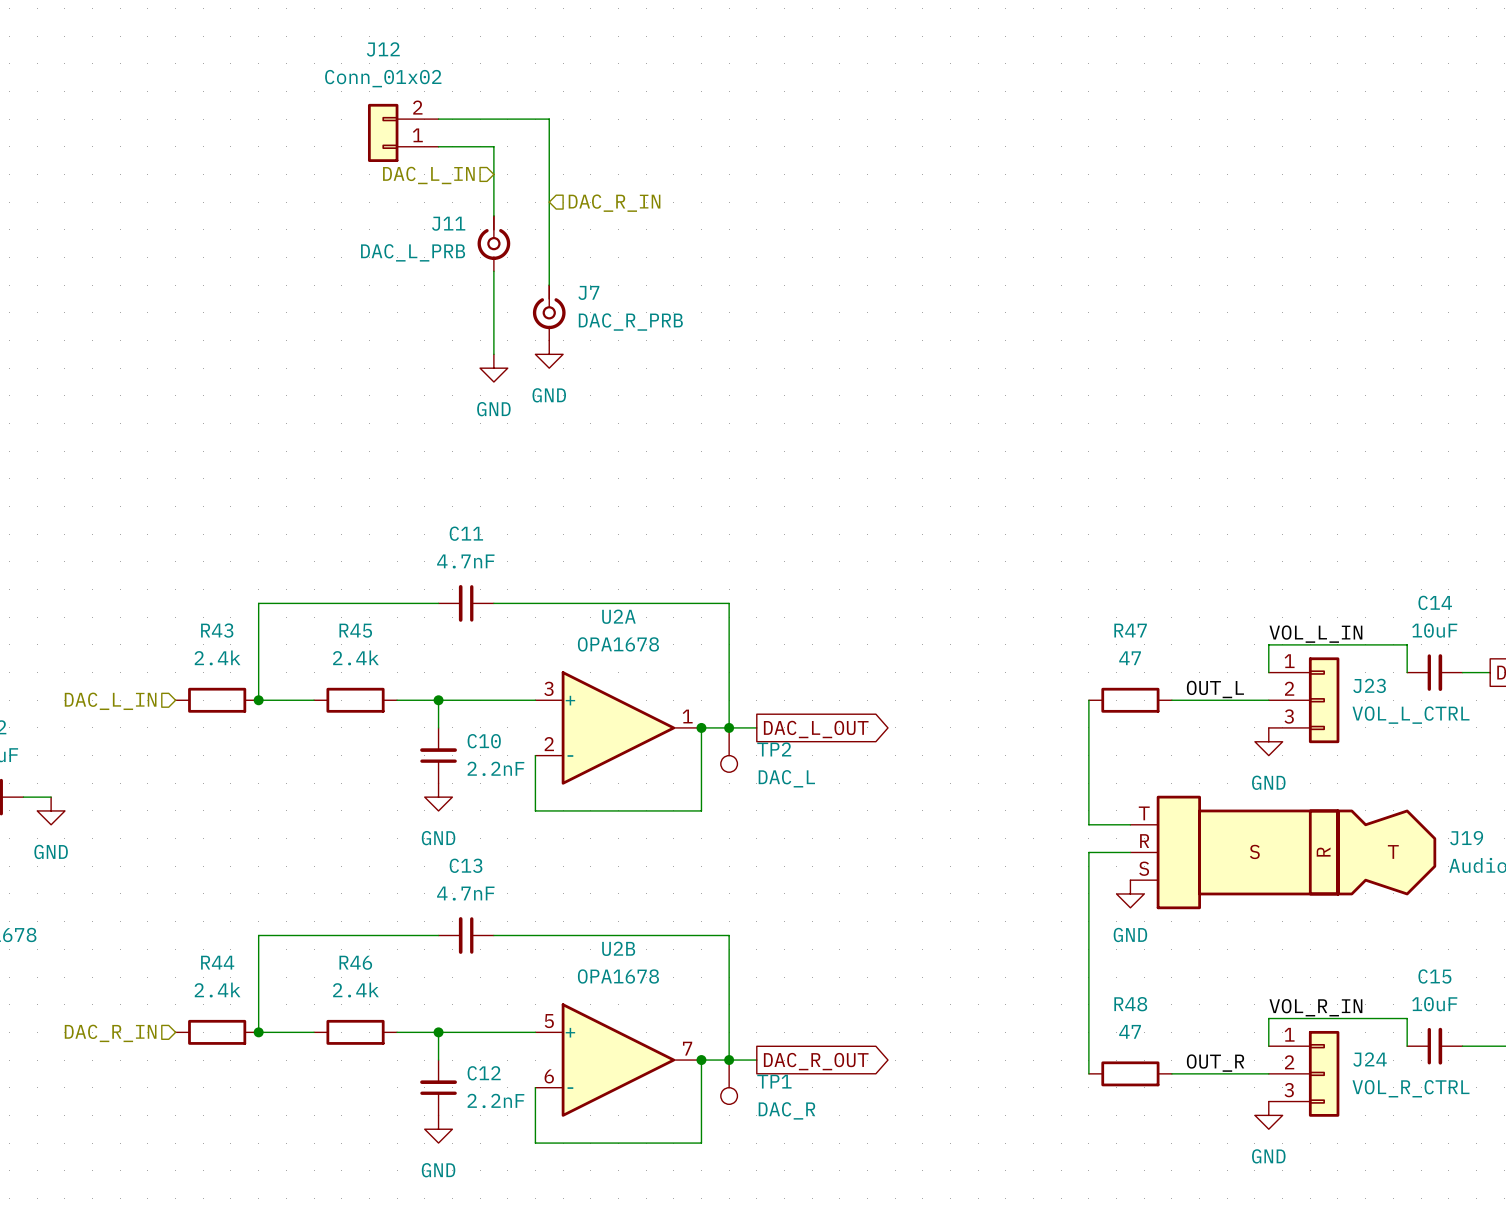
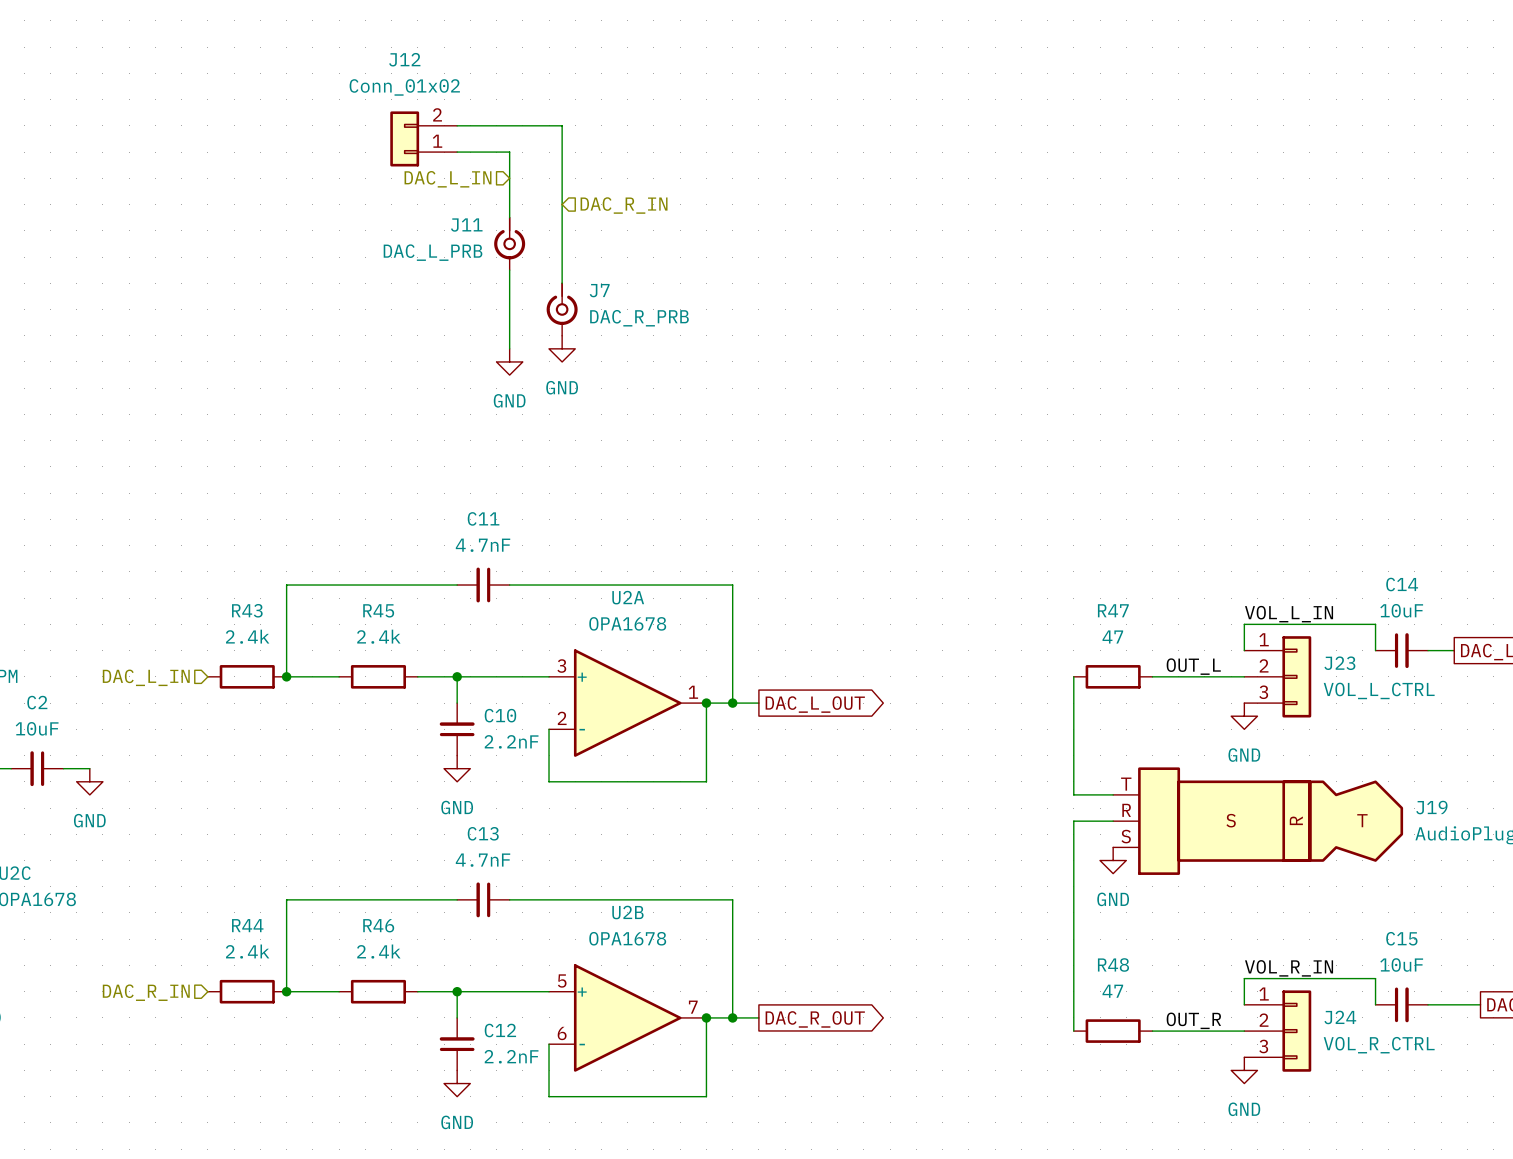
TP2: DAC_L (729, 750) -> none
TP1: DAC_R (729, 1082) -> none

